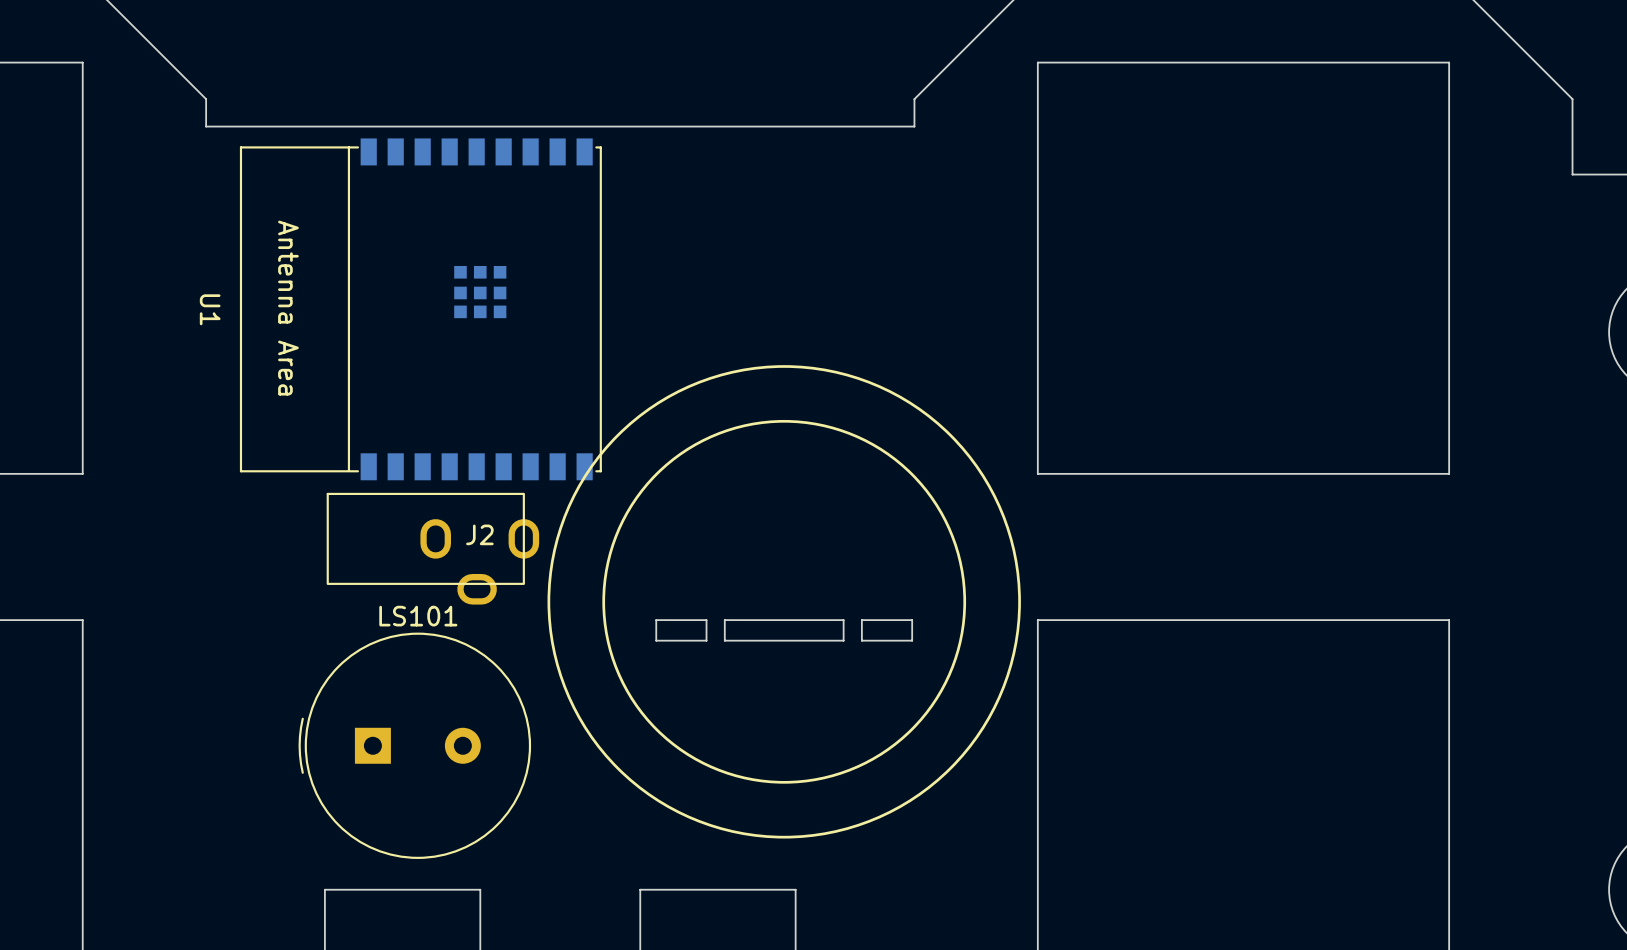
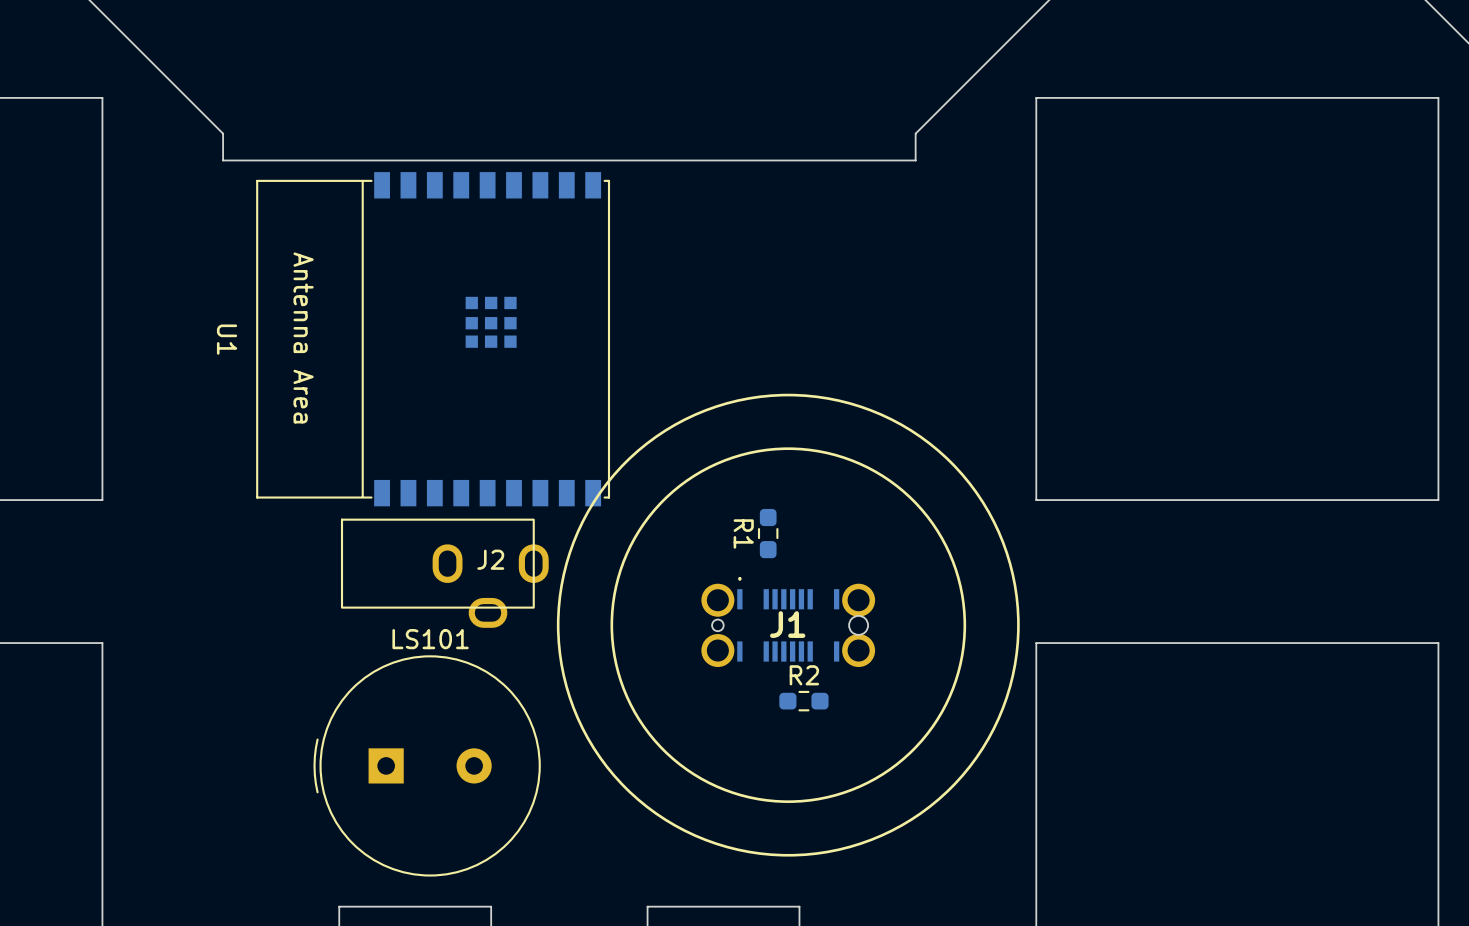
R1: none -> (768, 533)
J1: none -> (788, 622)
board edge: (706, 620) (656, 620) (656, 640) (706, 640) (706, 620) -> none
board edge: (843, 620) (724, 620) (724, 640) (843, 640) (843, 620) -> none
board edge: (912, 620) (861, 620) (861, 640) (912, 640) (912, 620) -> none
R2: none -> (803, 701)

